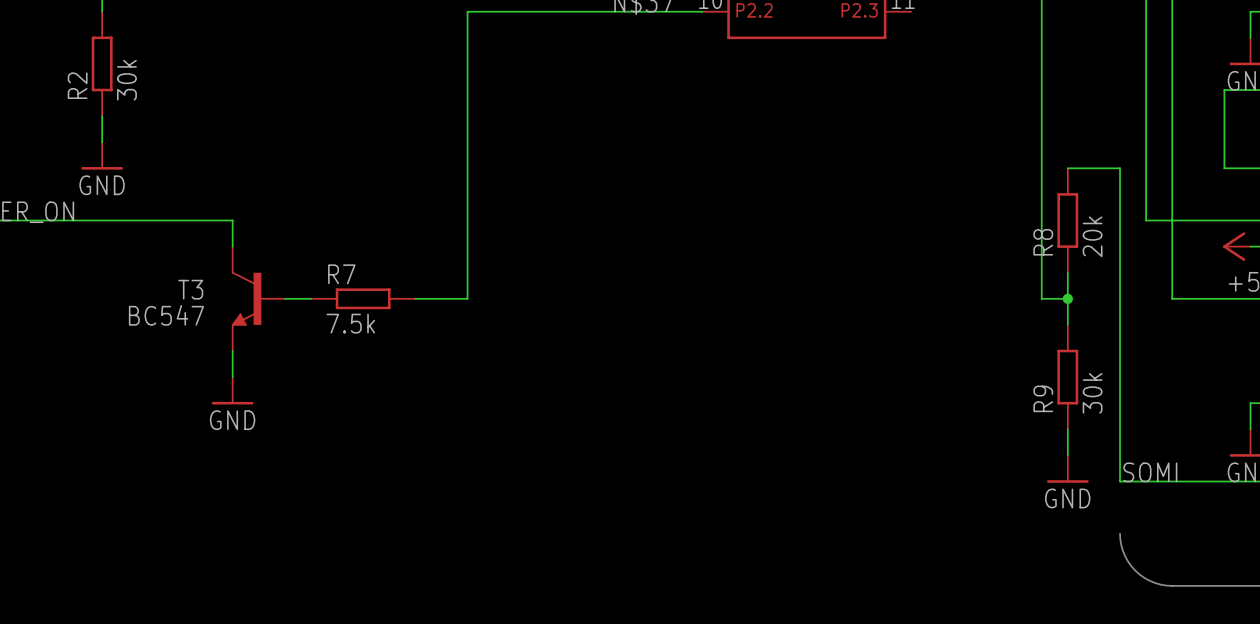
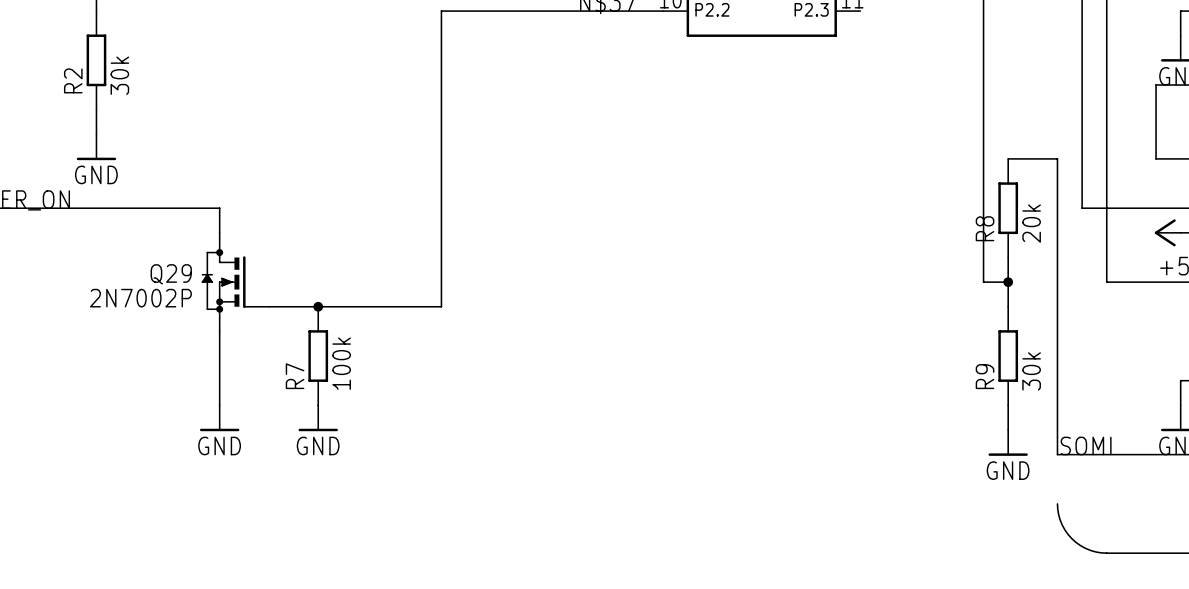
R7 name position: R7 (341, 274) -> R7 (295, 376)
Q29: none -> 2N7002P (235, 282)
T3: BC547 (258, 298) -> none
wire: (284, 298) (310, 298) -> none
R7 rotation: 0° (363, 298) -> 90° clockwise (318, 356)
R7 position: (363, 298) -> (318, 356)
wire: (415, 298) (467, 298) -> (268, 306) (441, 306) (441, 282)
R7 value: 7.5k (350, 323) -> 100k (341, 363)
junction: none -> (318, 306)
power symbol position: GND (232, 390) -> GND (219, 418)
power symbol: none -> GND (318, 418)

